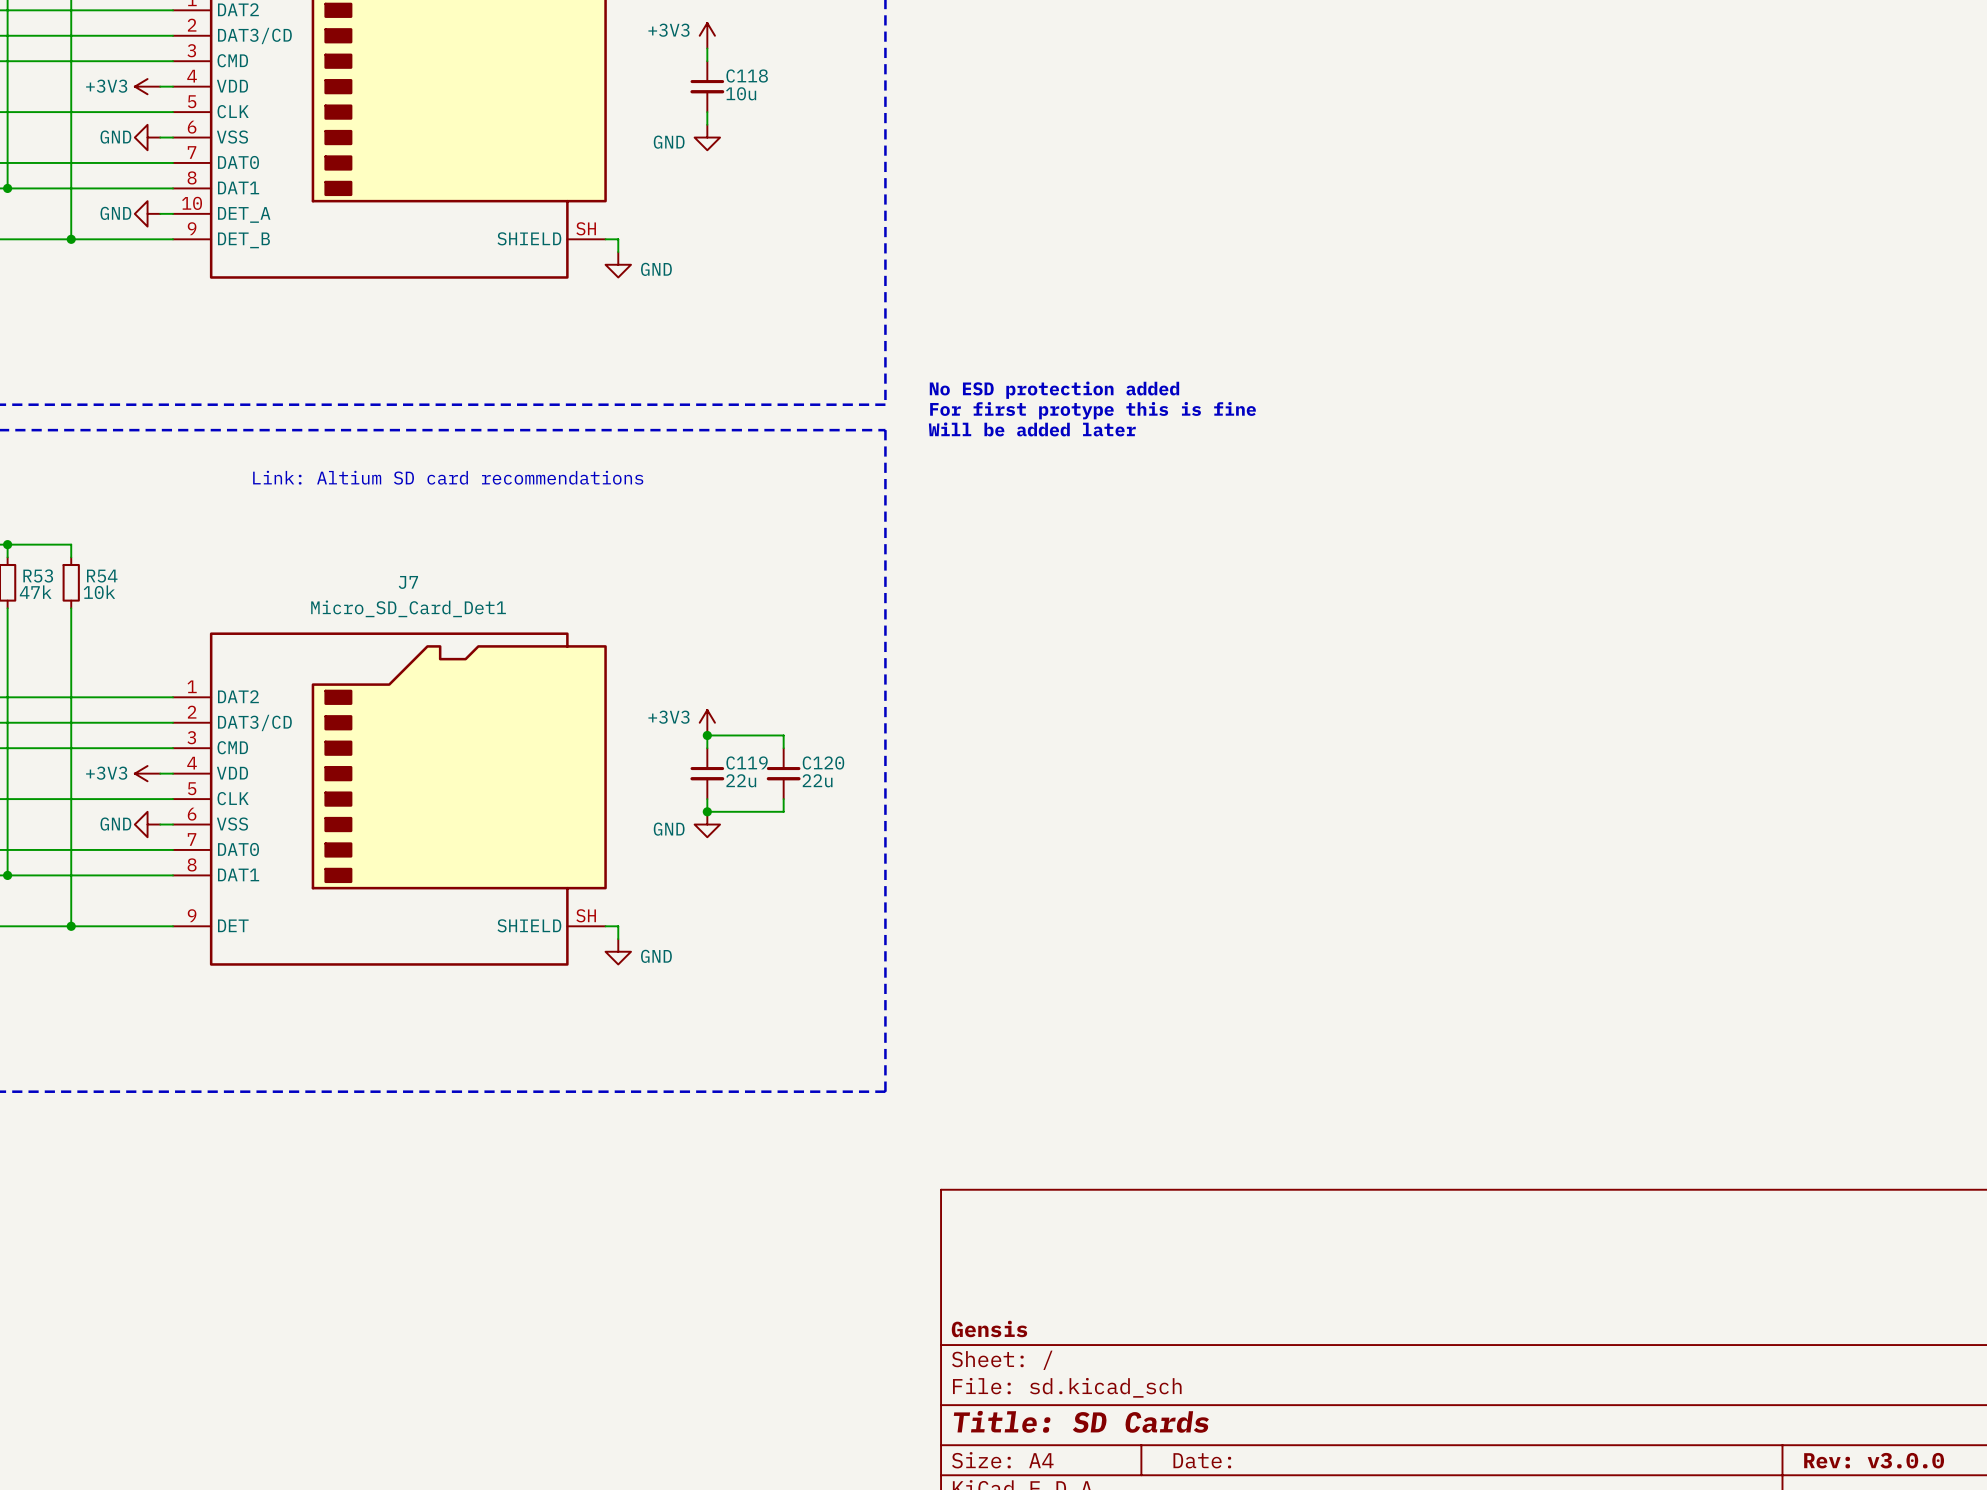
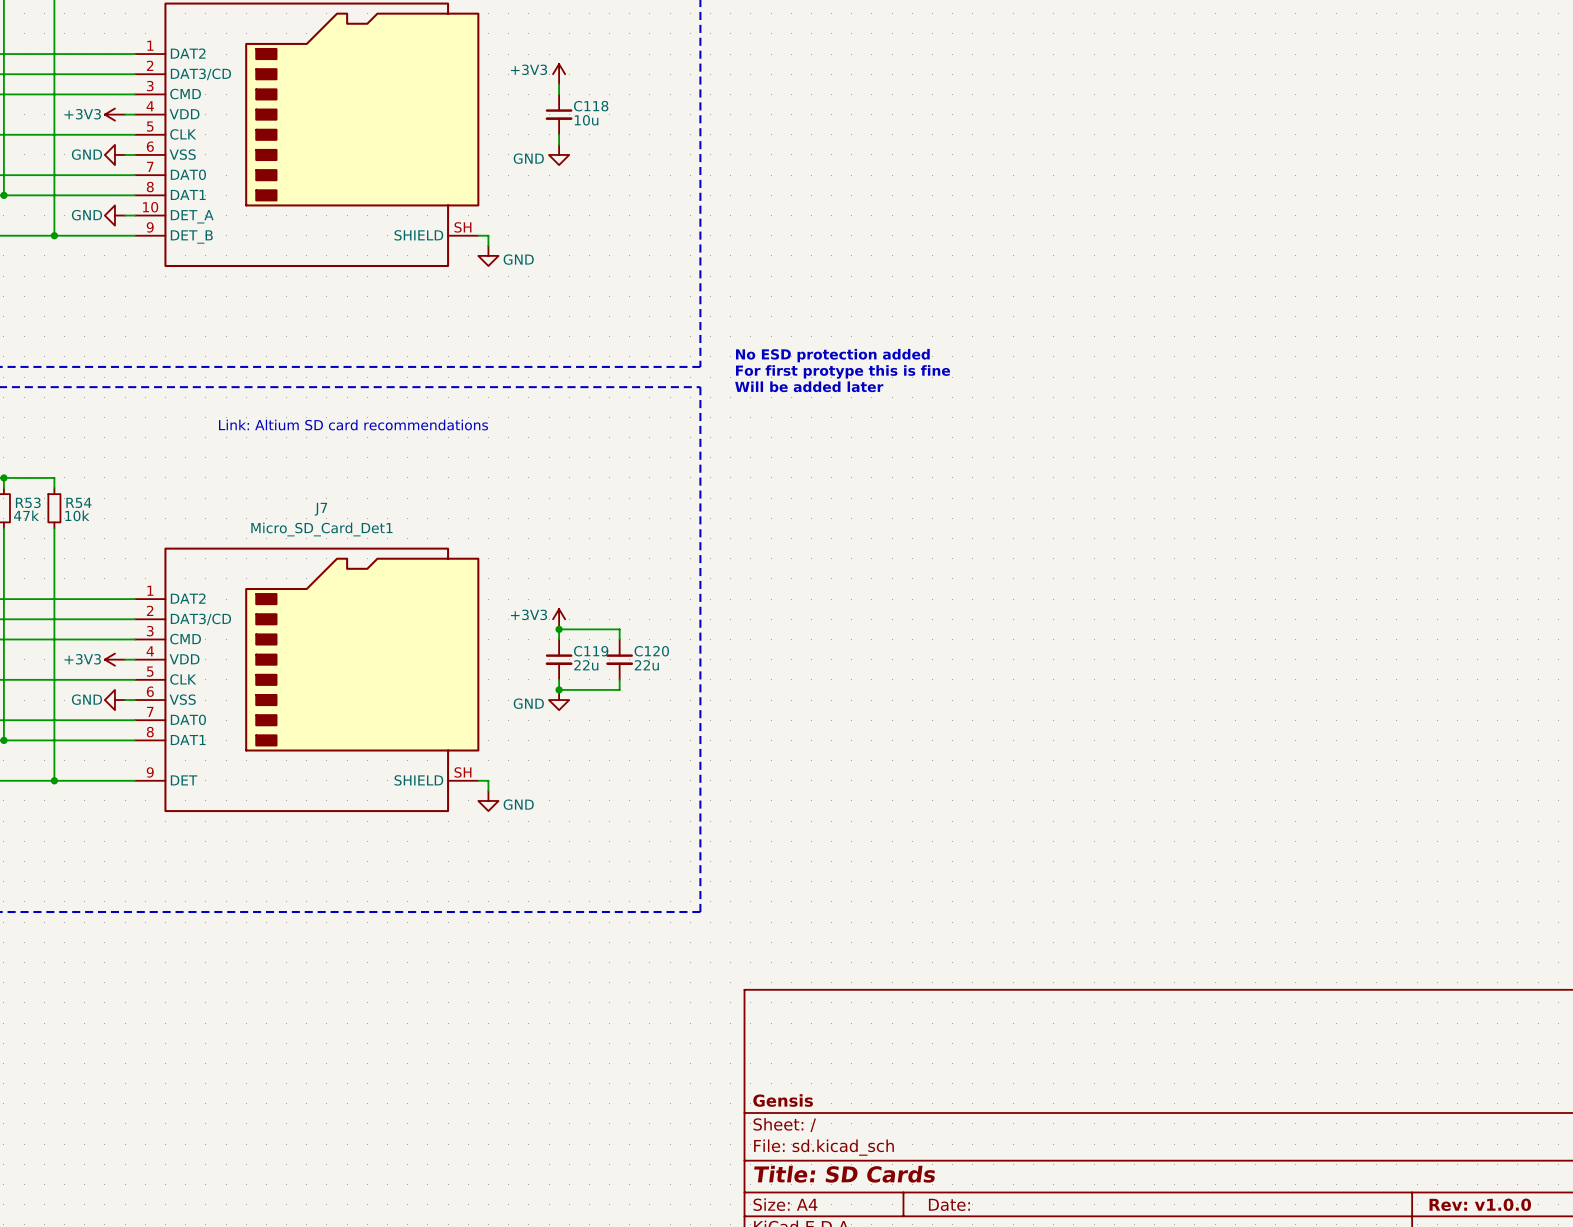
title block: Rev: v3.0.0 (1874, 1460) -> Rev: v1.0.0 (1480, 1204)

